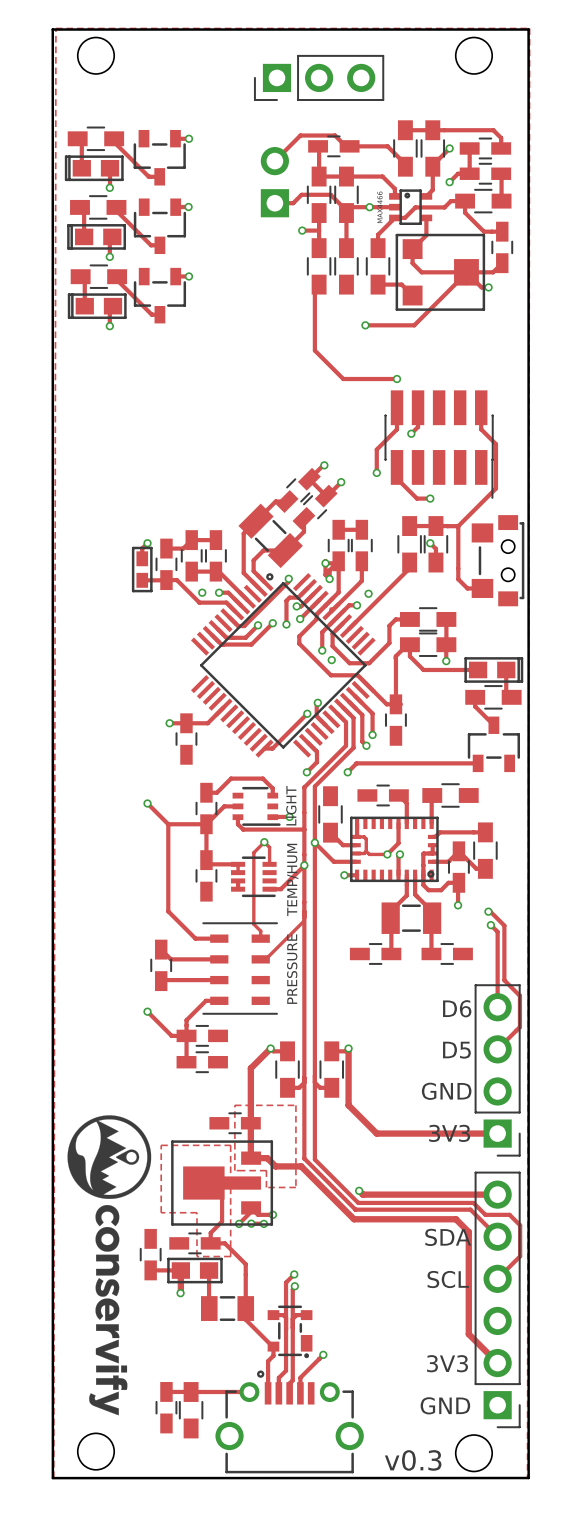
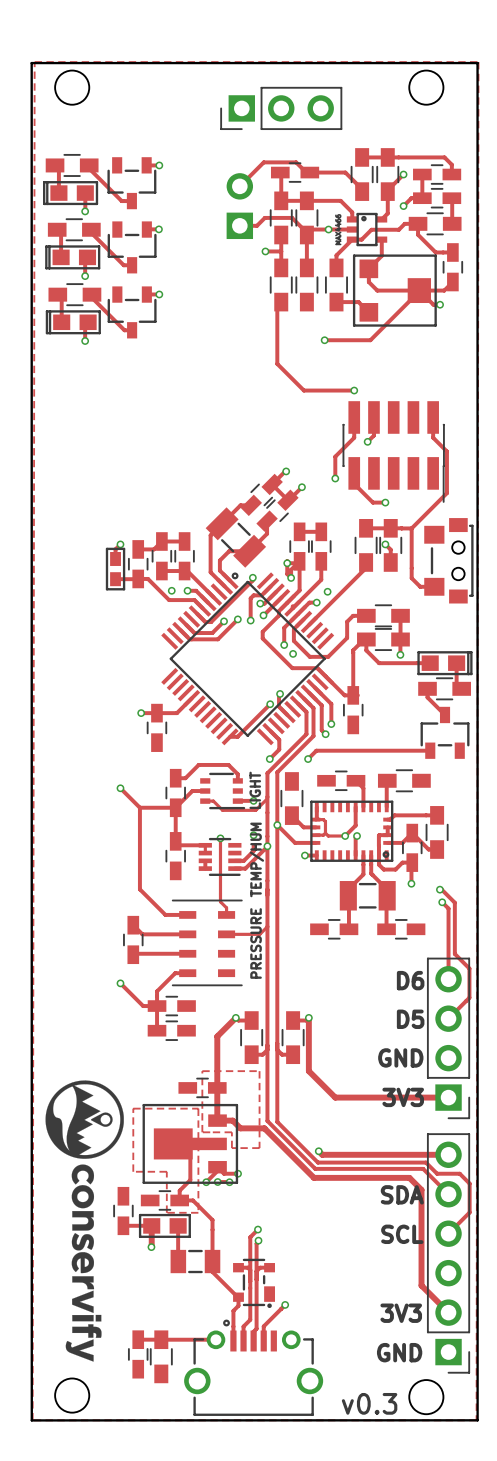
track: (237, 817) (237, 824) (243, 829) (304, 829) -> (205, 801) (213, 801) (222, 810) (255, 810) (267, 796)
via: (264, 842) -> none
via: none -> (253, 835)
via: none -> (220, 838)
track: (269, 864) (269, 847) (264, 842) (253, 852) (254, 924) -> (220, 838) (220, 901)
track: none -> (253, 846) (253, 851) (243, 860) (234, 860)
track: (304, 920) (265, 959) -> (267, 926) (259, 934) (231, 934)

